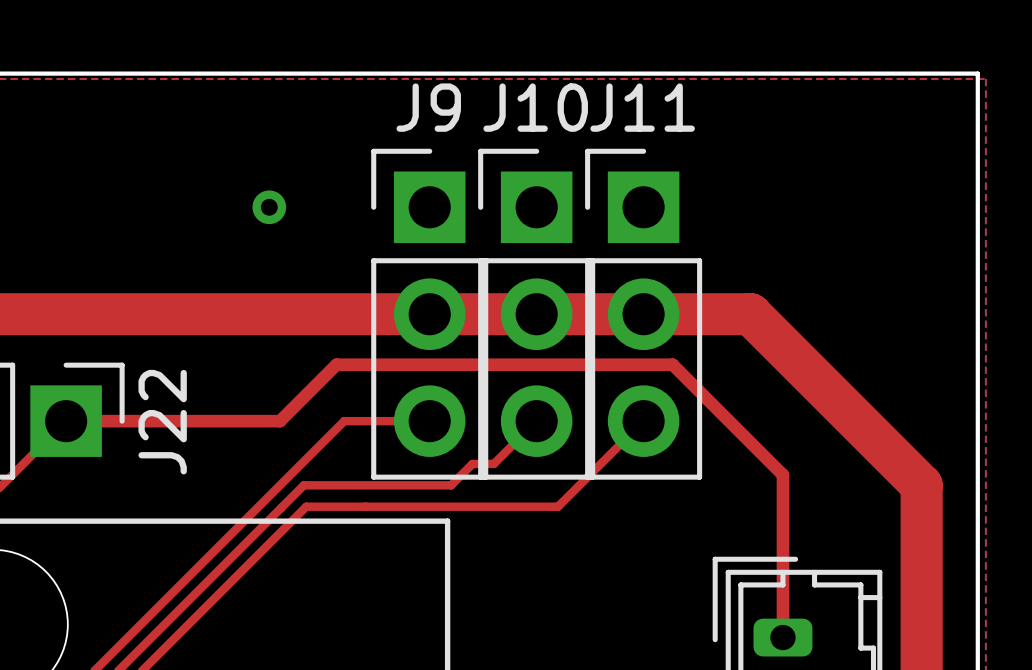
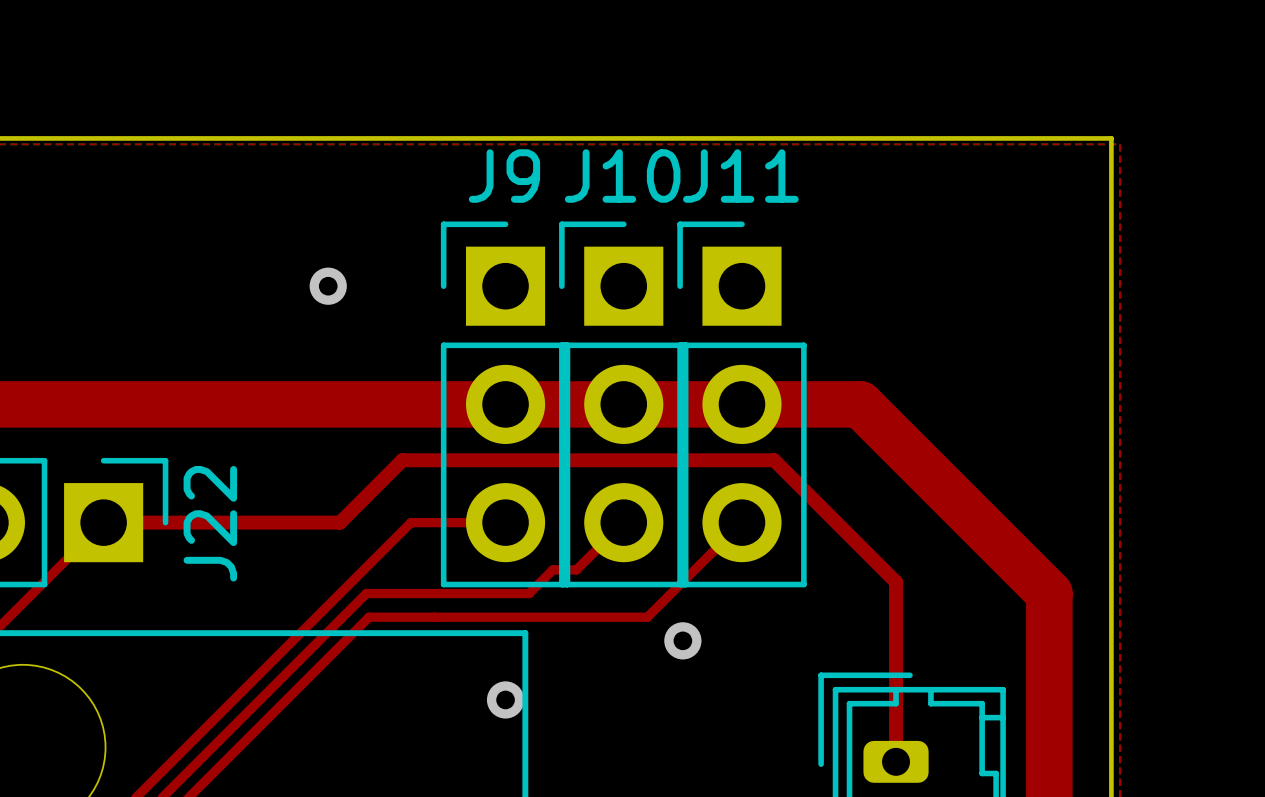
via: none -> (682, 640)
via: none -> (505, 699)

